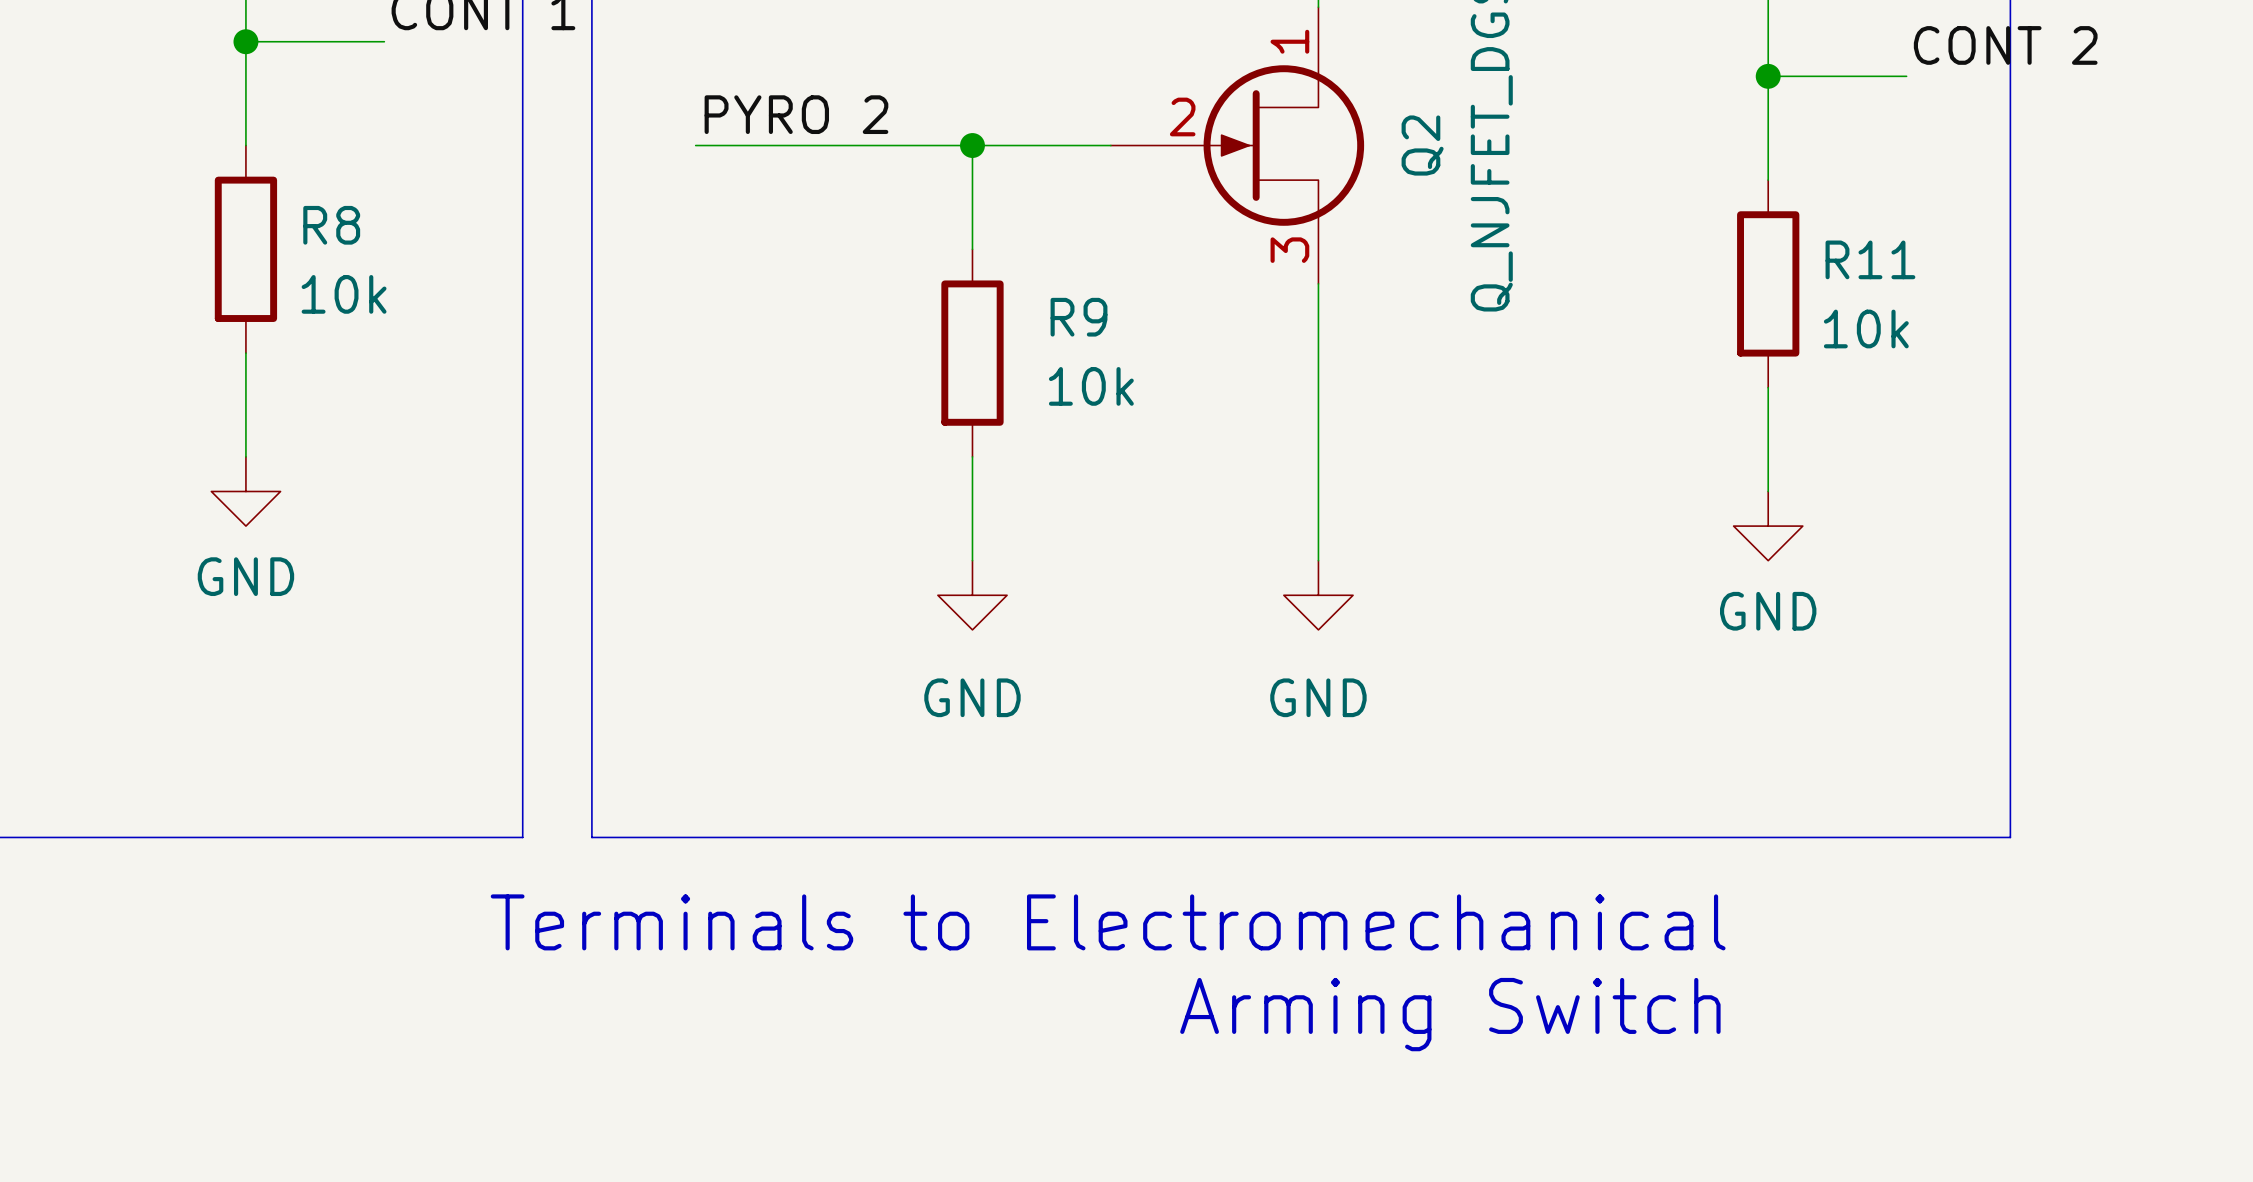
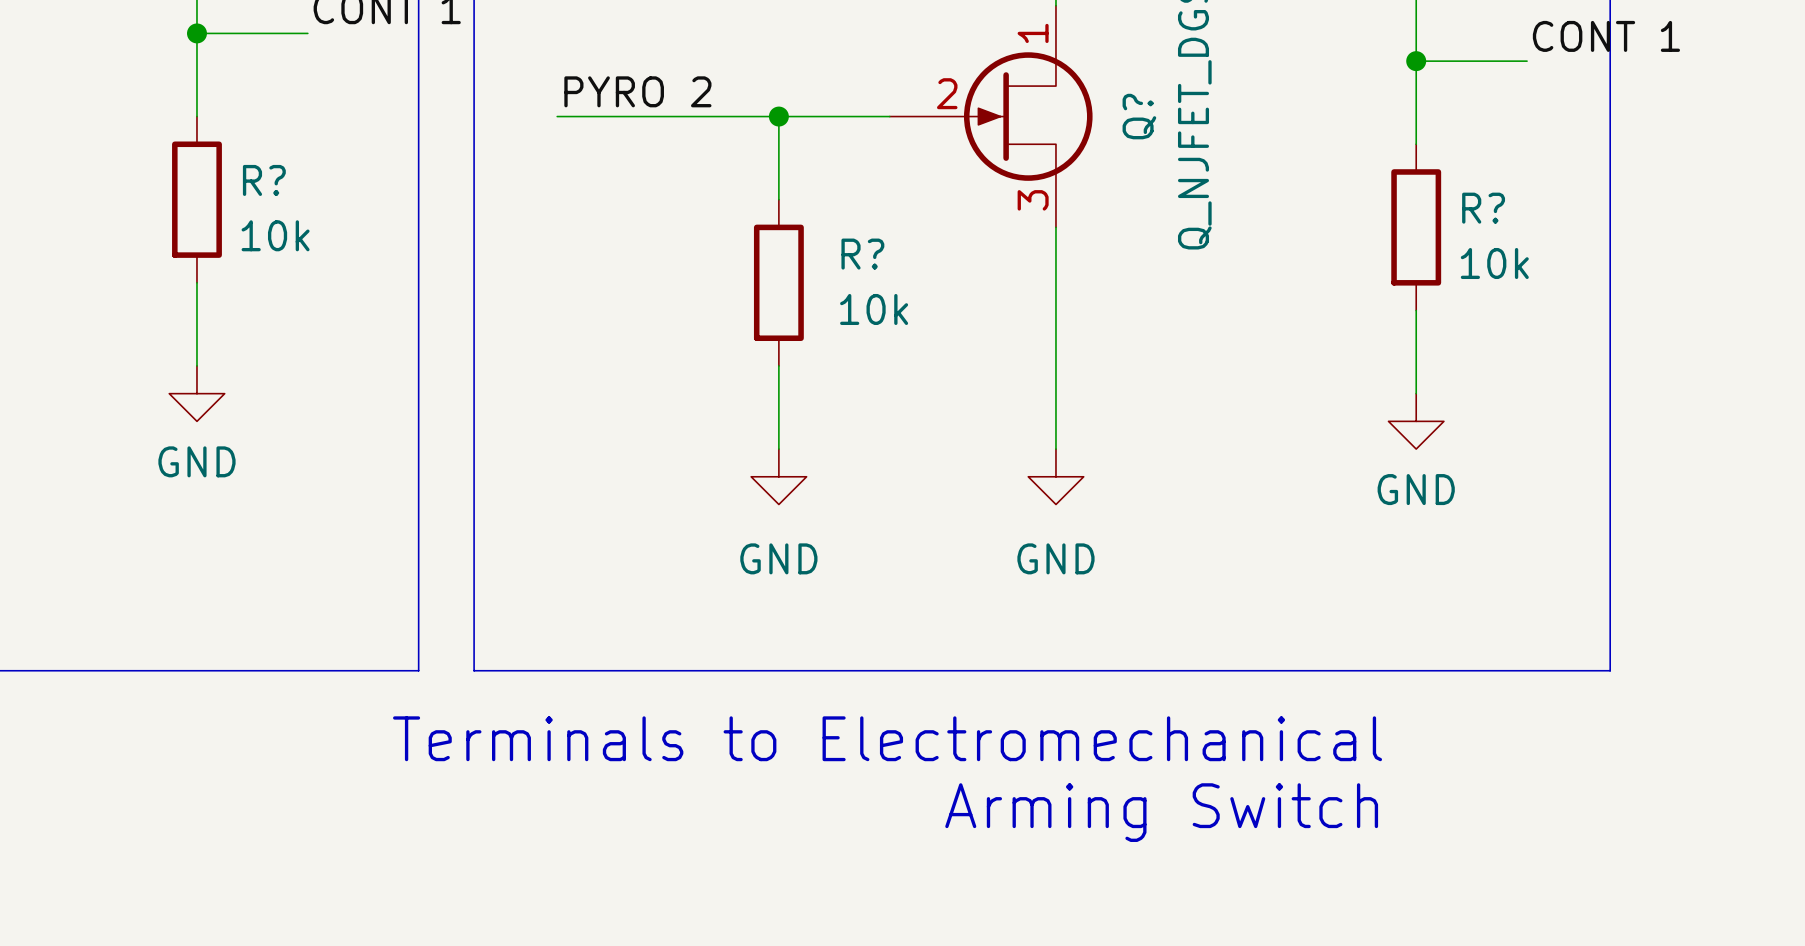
label: CONT 2 (2005, 45) -> CONT 1 (1606, 36)
Q2 name: Q2 (1422, 145) -> Q? (1139, 116)
R8 name: R8 (331, 225) -> R? (264, 180)
R11 name: R11 (1870, 259) -> R? (1483, 208)
R9 name: R9 (1079, 317) -> R? (862, 254)

